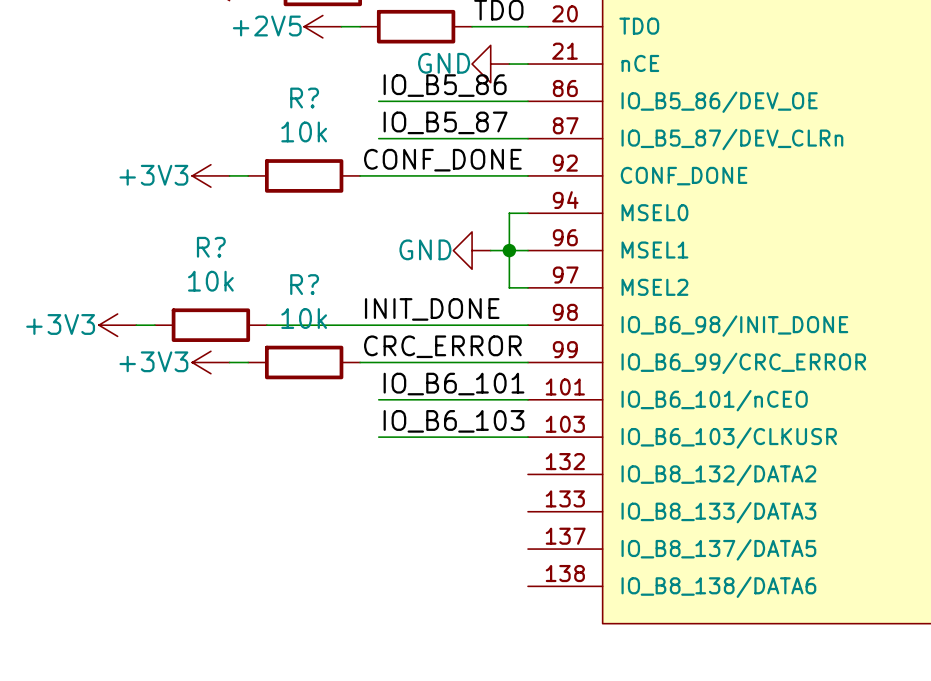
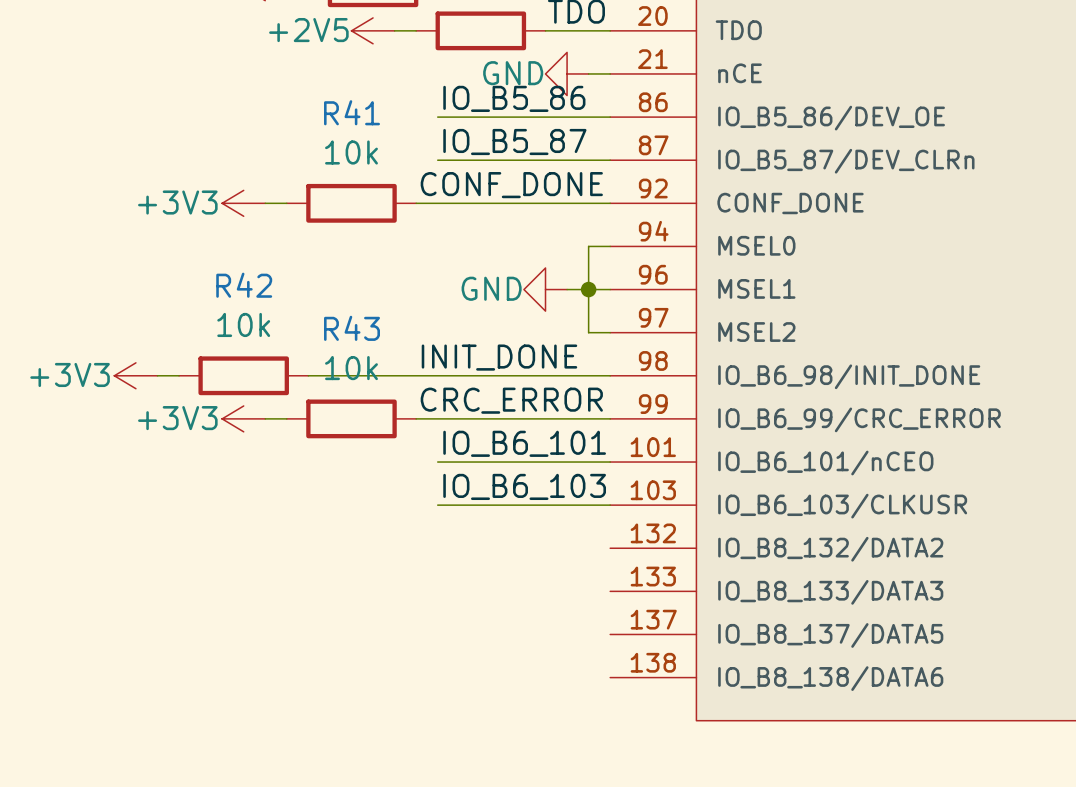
R? name: R? (304, 98) -> R41 (352, 112)
R? name: R? (211, 247) -> R42 (244, 285)
R? name: R? (304, 284) -> R43 (352, 328)

